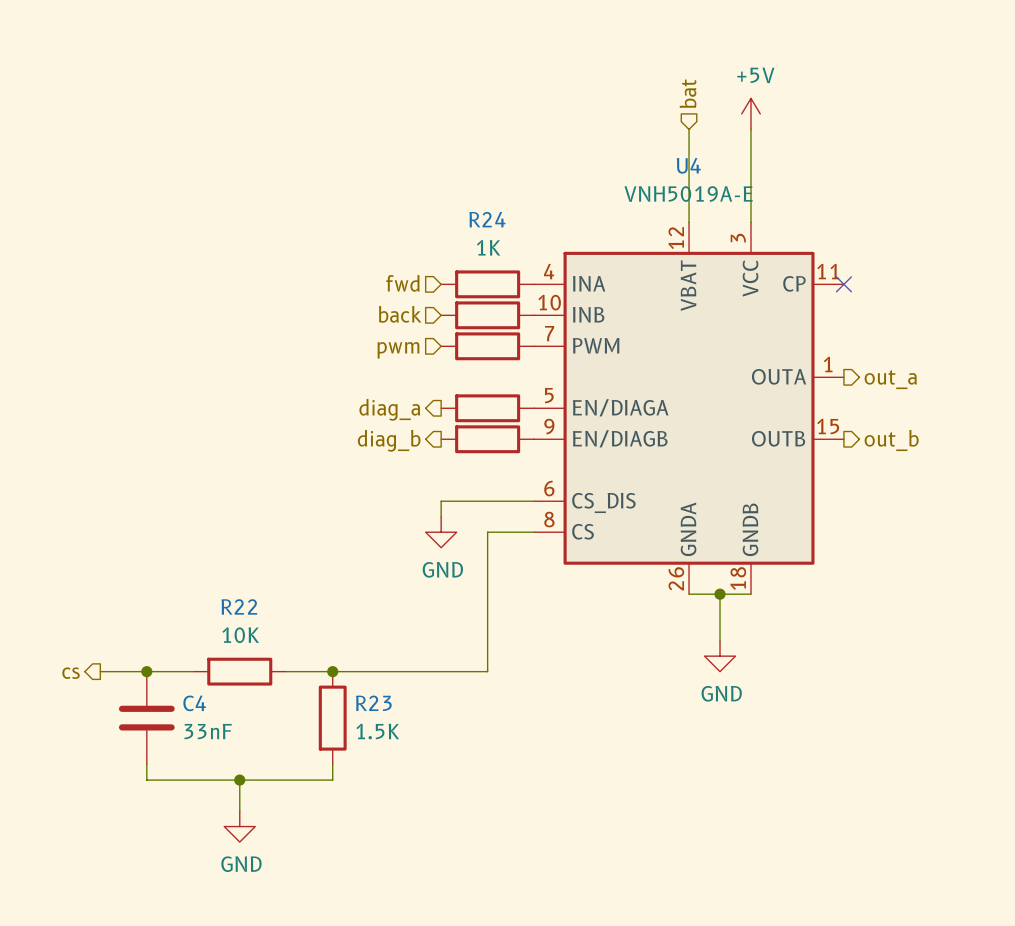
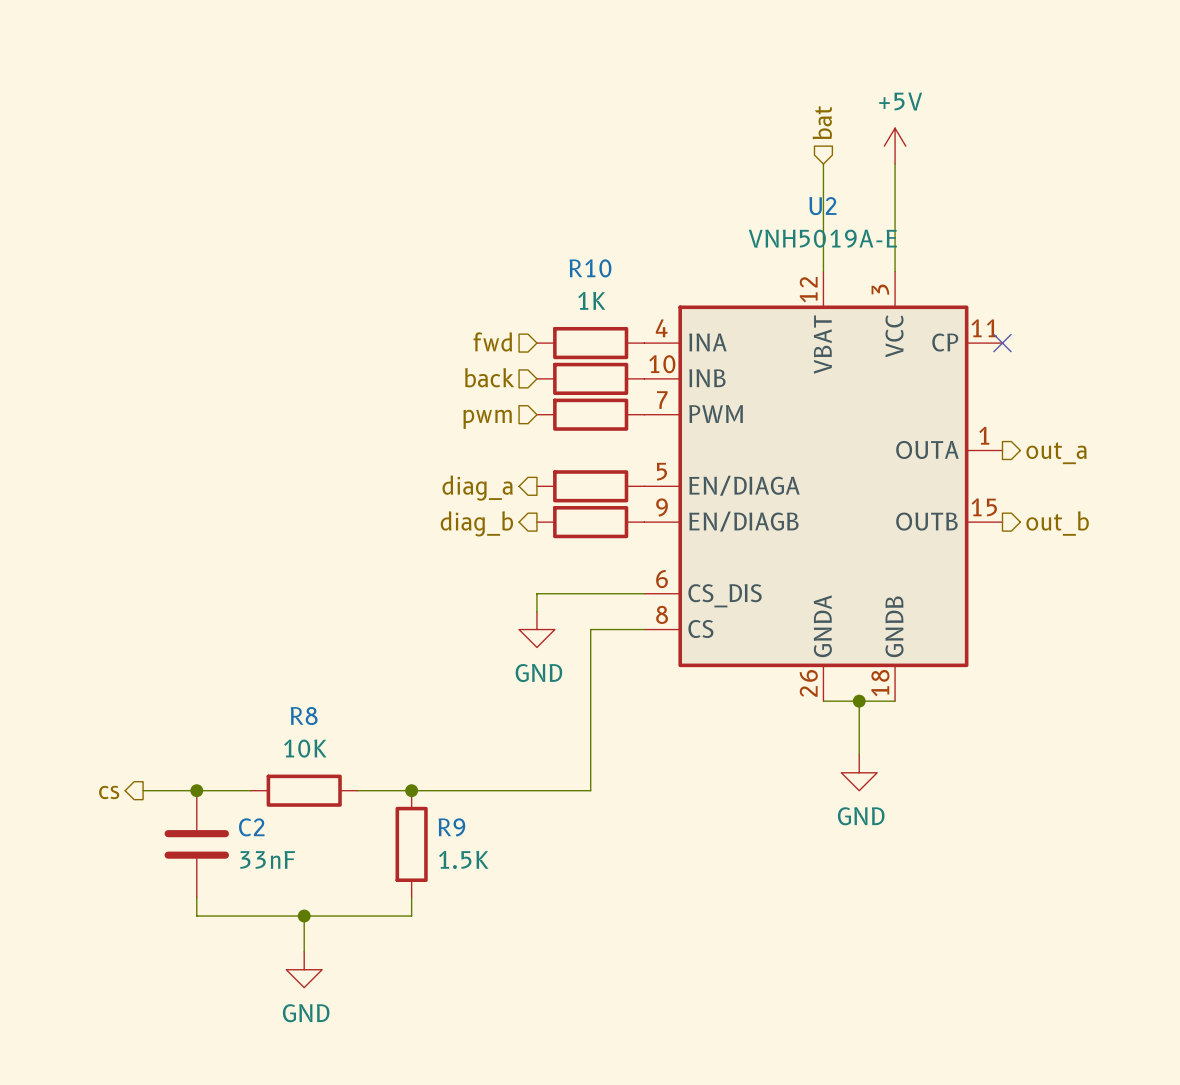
U4 name: U4 (688, 165) -> U2 (822, 206)
R24 name: R24 (487, 219) -> R10 (590, 268)
R22 name: R22 (239, 606) -> R8 (304, 716)
C4 name: C4 (194, 703) -> C2 (251, 827)
R23 name: R23 (373, 703) -> R9 (451, 827)

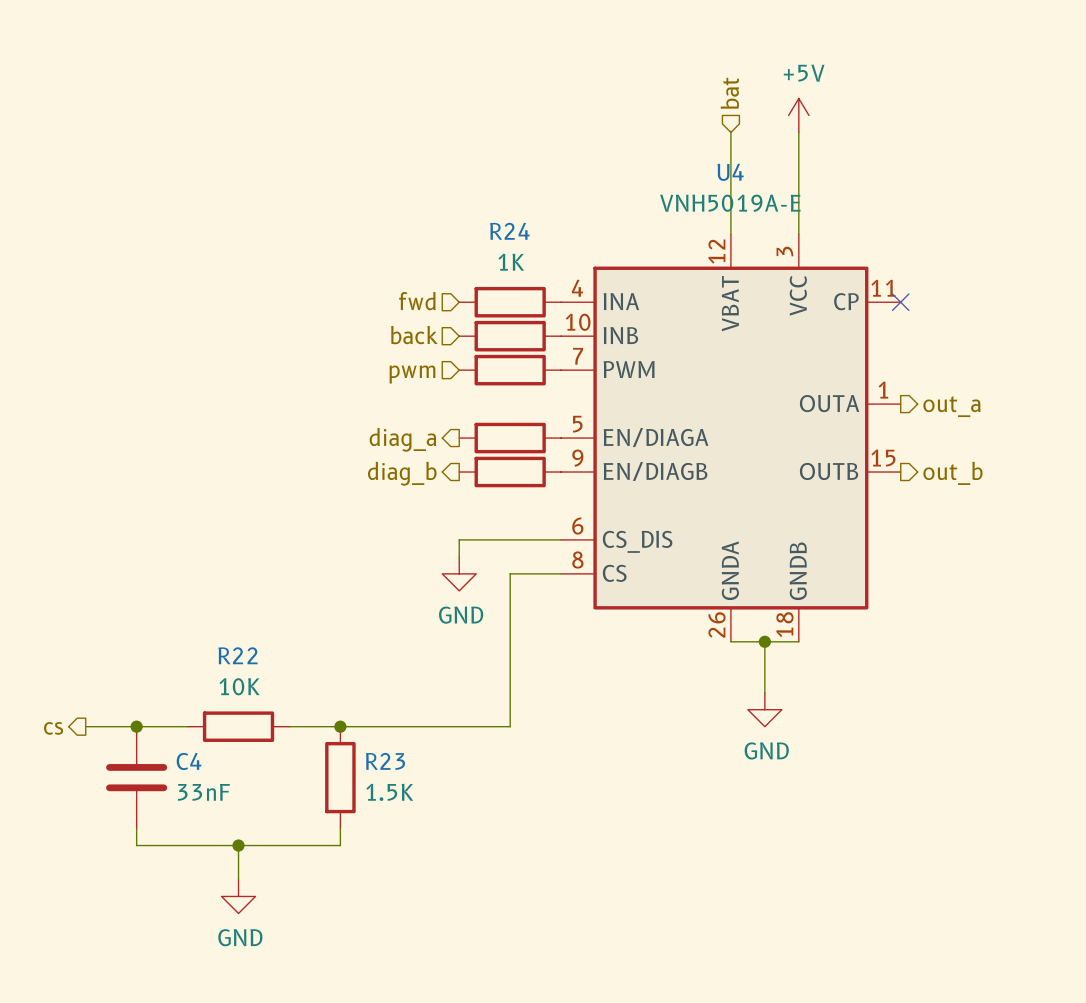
U2 name: U2 (822, 206) -> U4 (730, 172)
R10 name: R10 (590, 268) -> R24 (509, 231)
R8 name: R8 (304, 716) -> R22 (238, 655)
C2 name: C2 (251, 827) -> C4 (189, 761)
R9 name: R9 (451, 827) -> R23 (385, 761)

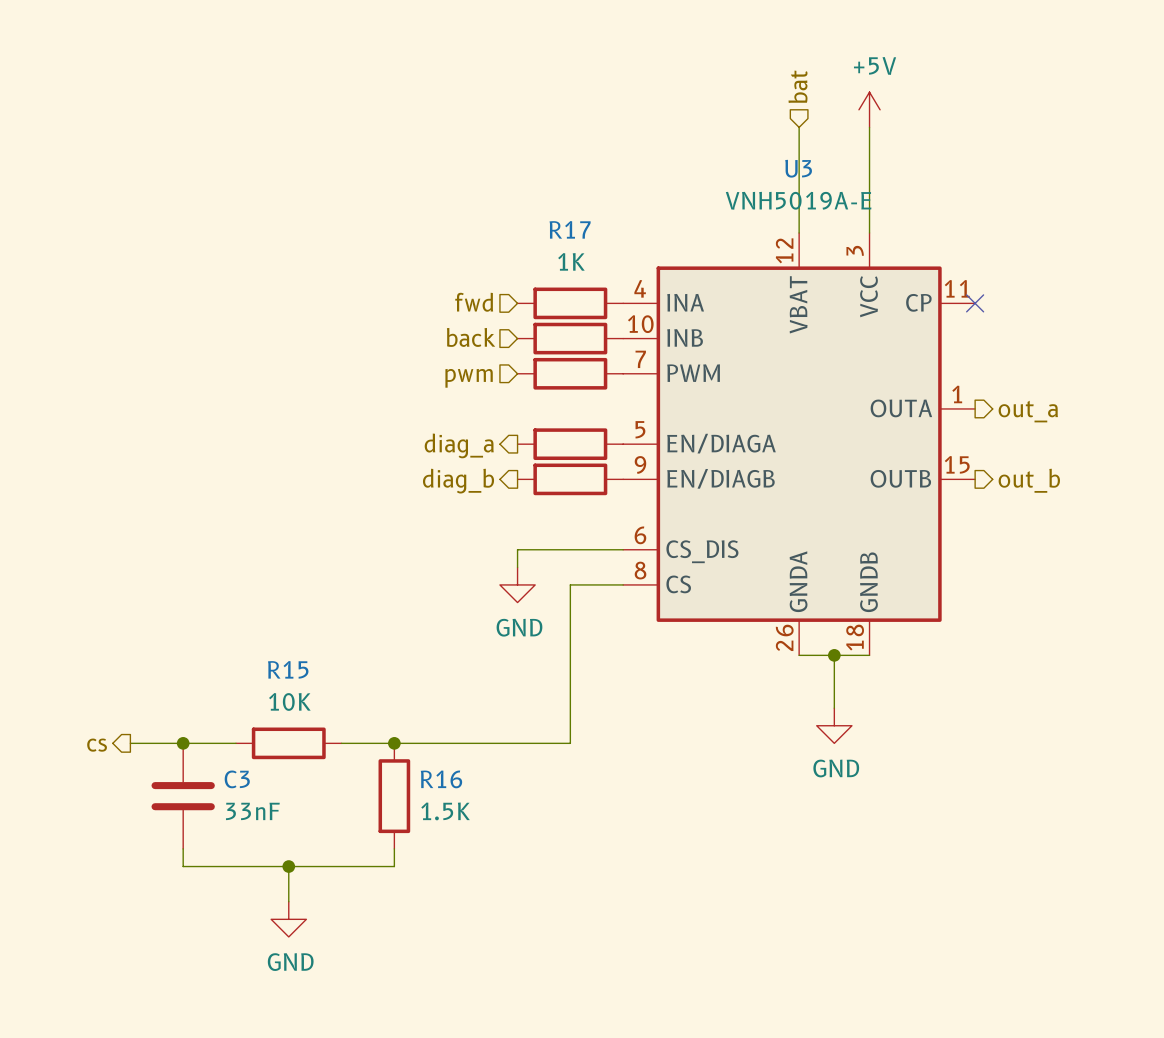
U4 name: U4 (730, 172) -> U3 (798, 168)
R24 name: R24 (509, 231) -> R17 (570, 229)
R22 name: R22 (238, 655) -> R15 (288, 669)
C4 name: C4 (189, 761) -> C3 (237, 779)
R23 name: R23 (385, 761) -> R16 (441, 779)

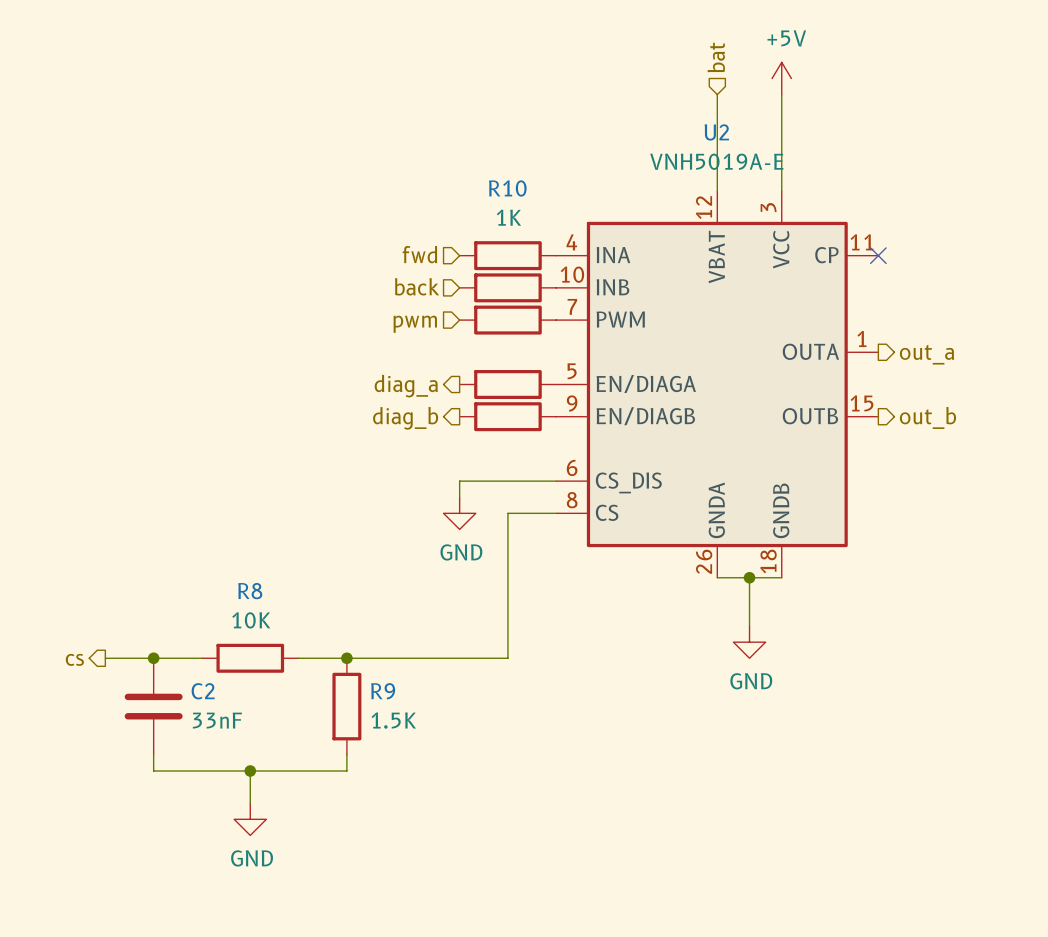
U3 name: U3 (798, 168) -> U2 (716, 132)
R17 name: R17 (570, 229) -> R10 (507, 188)
R15 name: R15 (288, 669) -> R8 (250, 591)
C3 name: C3 (237, 779) -> C2 (203, 691)
R16 name: R16 (441, 779) -> R9 (383, 691)

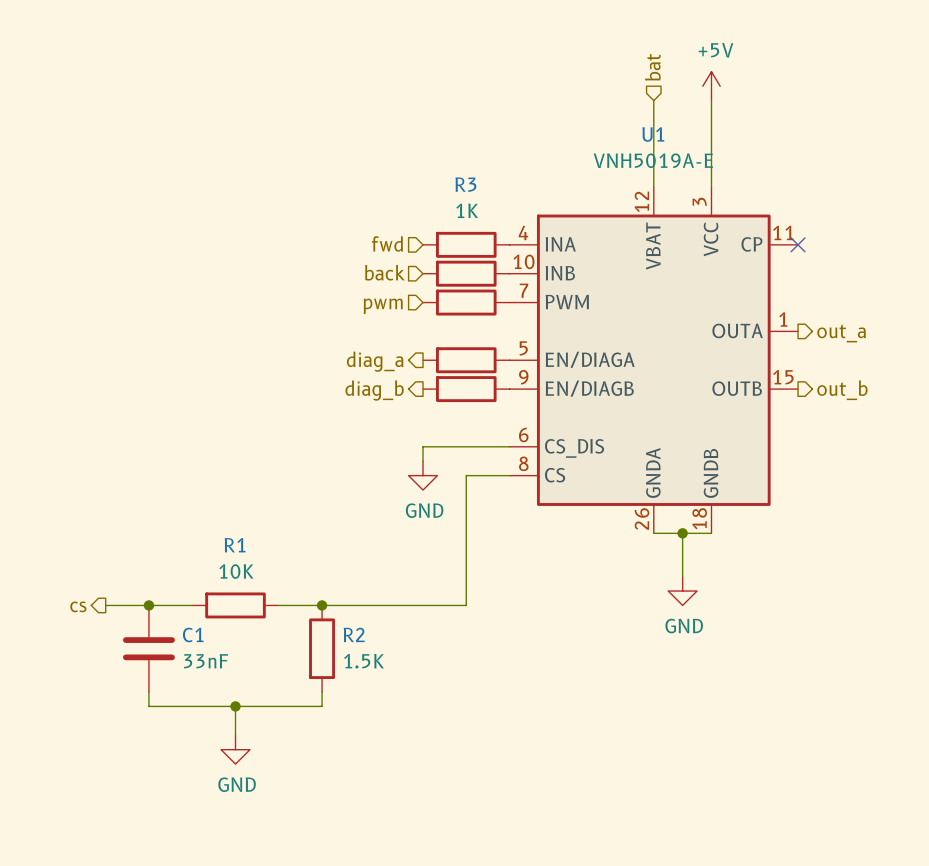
U2 name: U2 (716, 132) -> U1 (653, 134)
R10 name: R10 (507, 188) -> R3 (465, 184)
R8 name: R8 (250, 591) -> R1 (235, 545)
C2 name: C2 (203, 691) -> C1 (193, 634)
R9 name: R9 (383, 691) -> R2 (354, 634)

